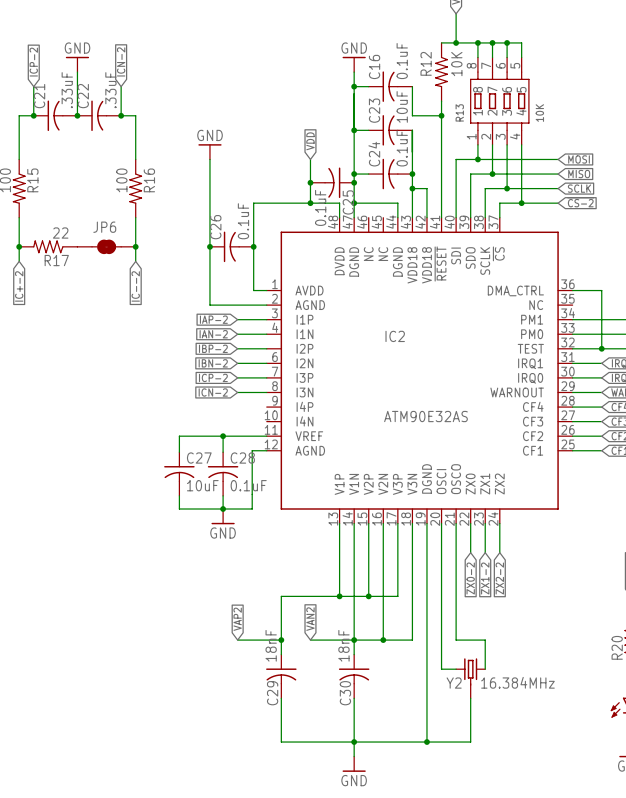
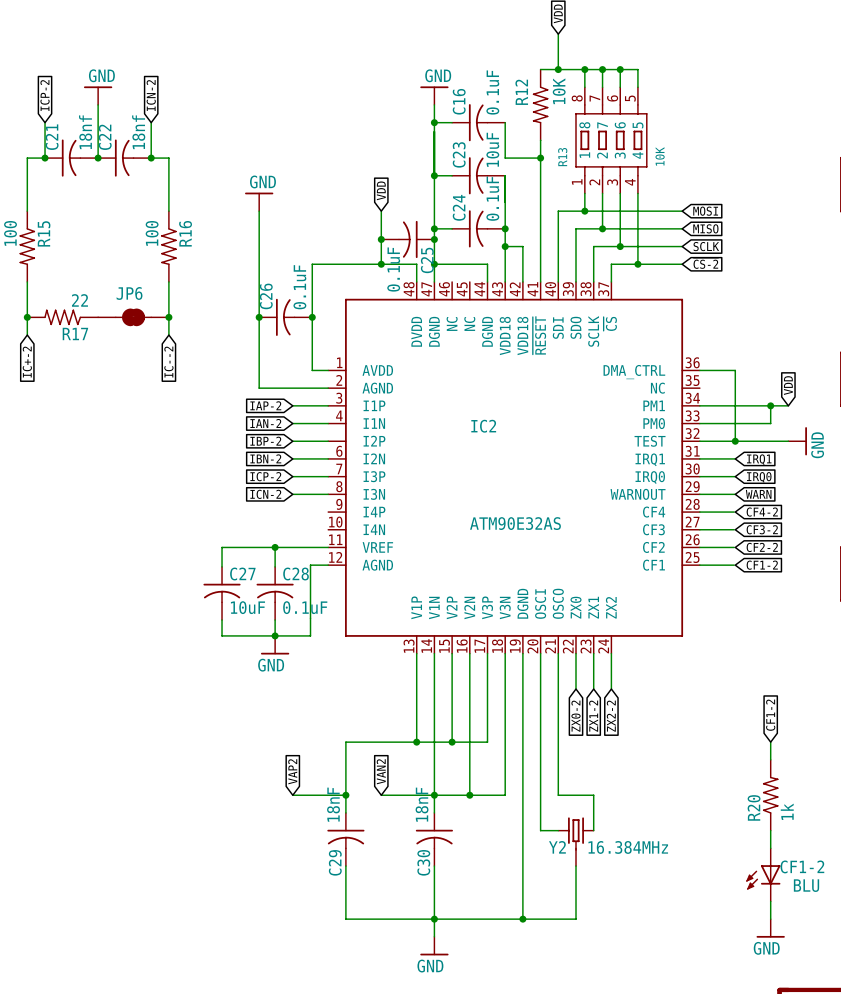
C21 value: .33uF (67, 90) -> 18nf (85, 132)
C22 value: .33uF (110, 90) -> 18nf (138, 132)

